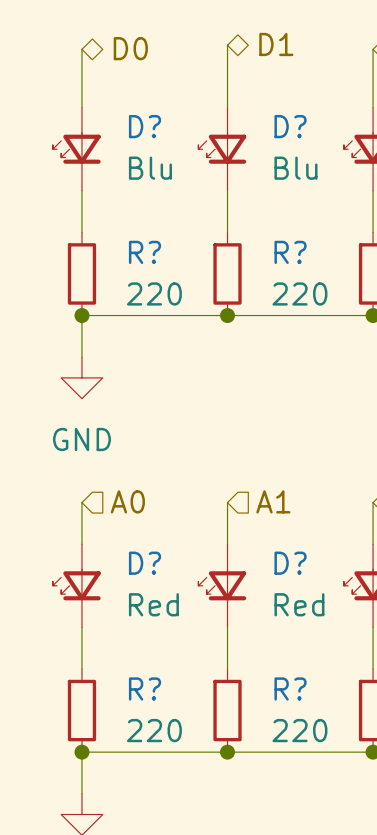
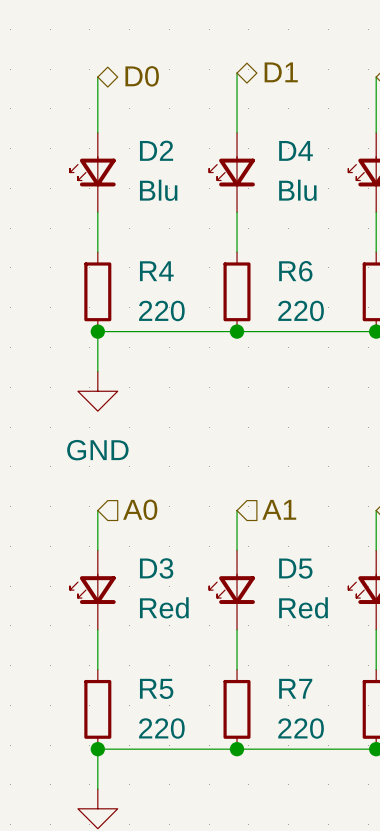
D? name: D? (145, 126) -> D2 (156, 150)
D? name: D? (290, 126) -> D4 (296, 150)
R? name: R? (145, 252) -> R4 (156, 271)
R? name: R? (290, 252) -> R6 (295, 271)
D? name: D? (145, 563) -> D3 (156, 568)
D? name: D? (290, 563) -> D5 (295, 568)
R? name: R? (145, 688) -> R5 (156, 688)
R? name: R? (290, 688) -> R7 (295, 688)

